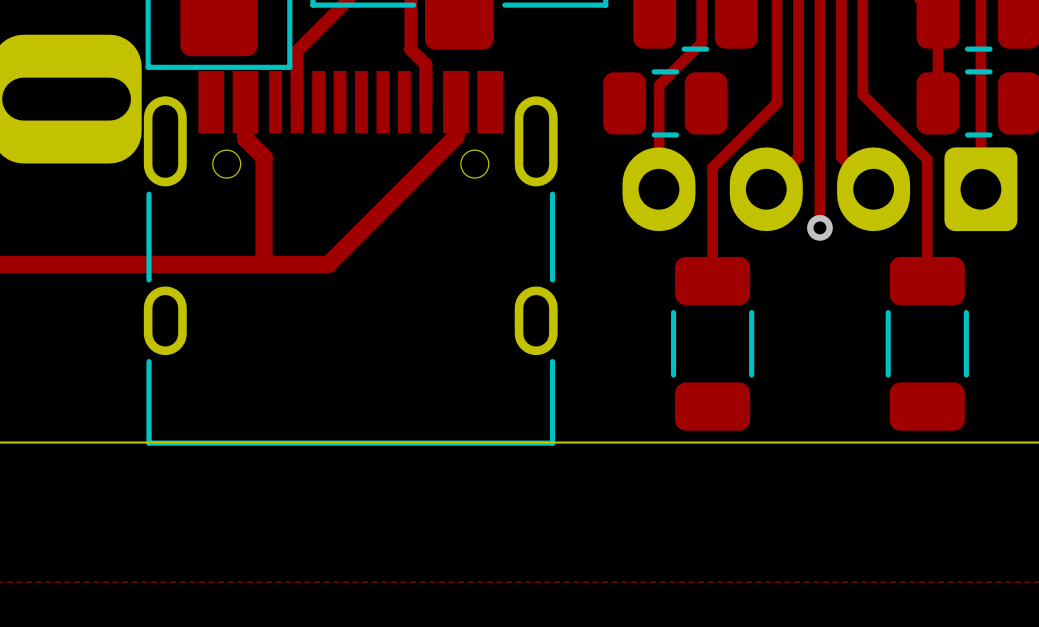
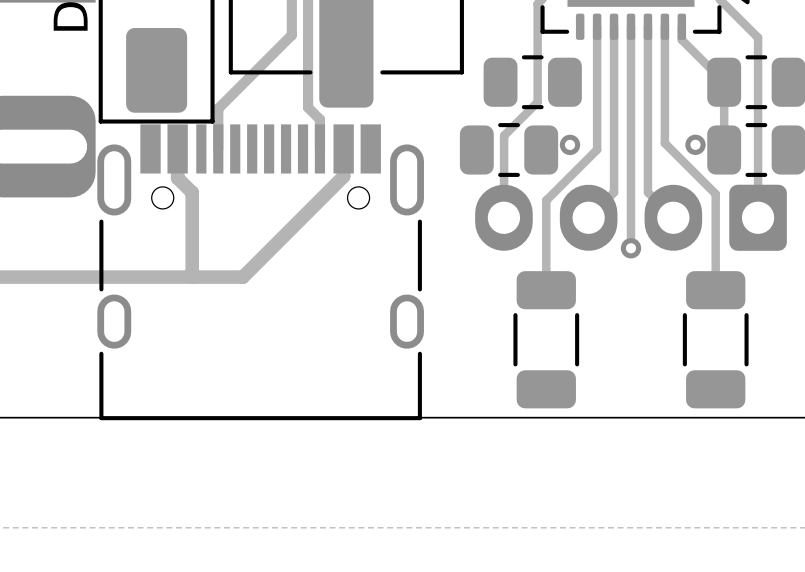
via: none -> (570, 144)
via: none -> (695, 144)

